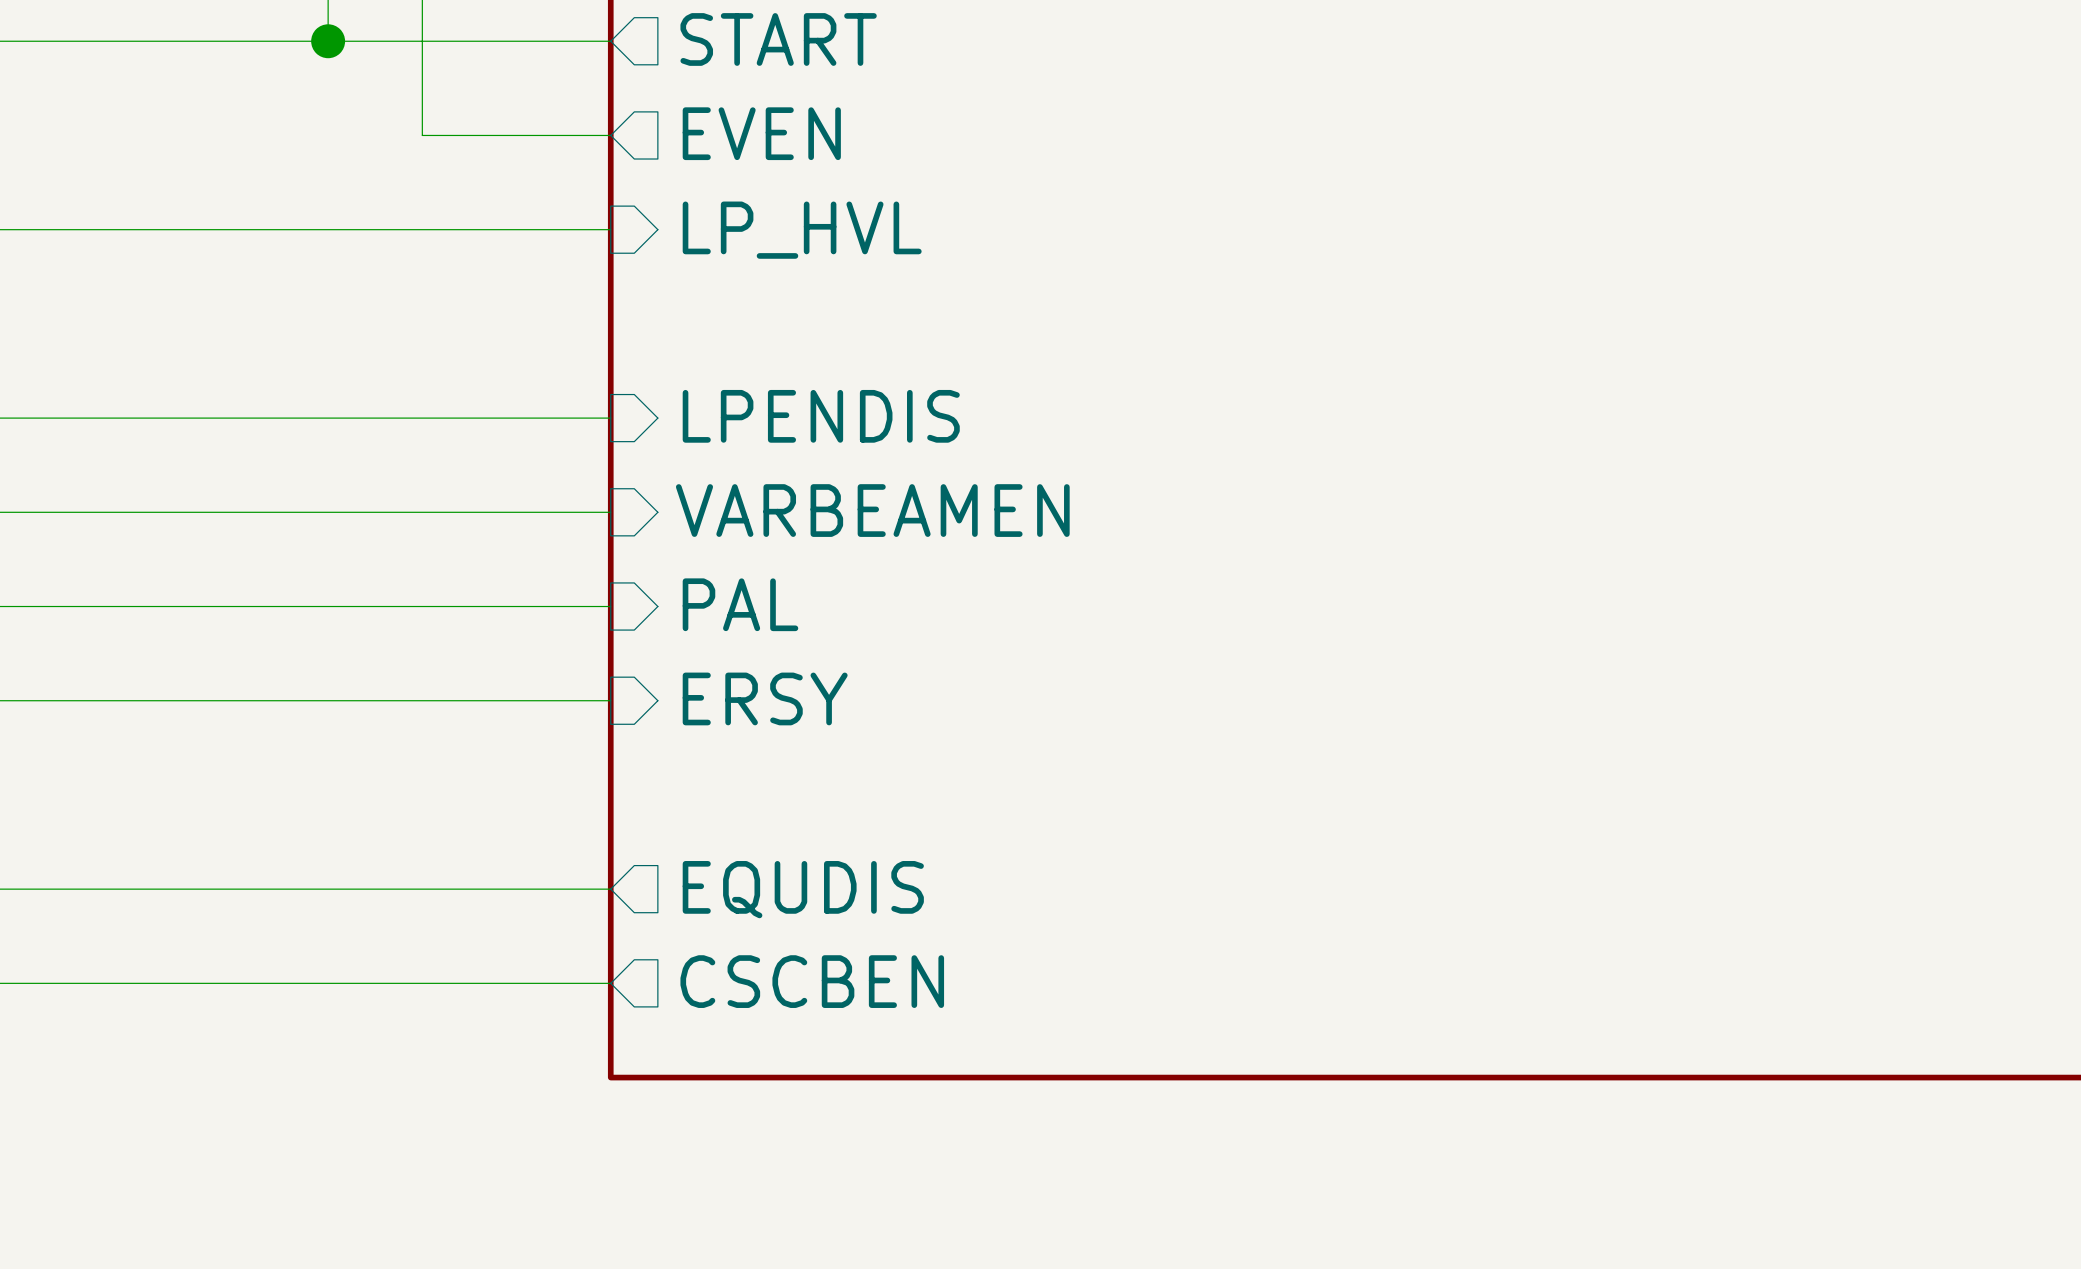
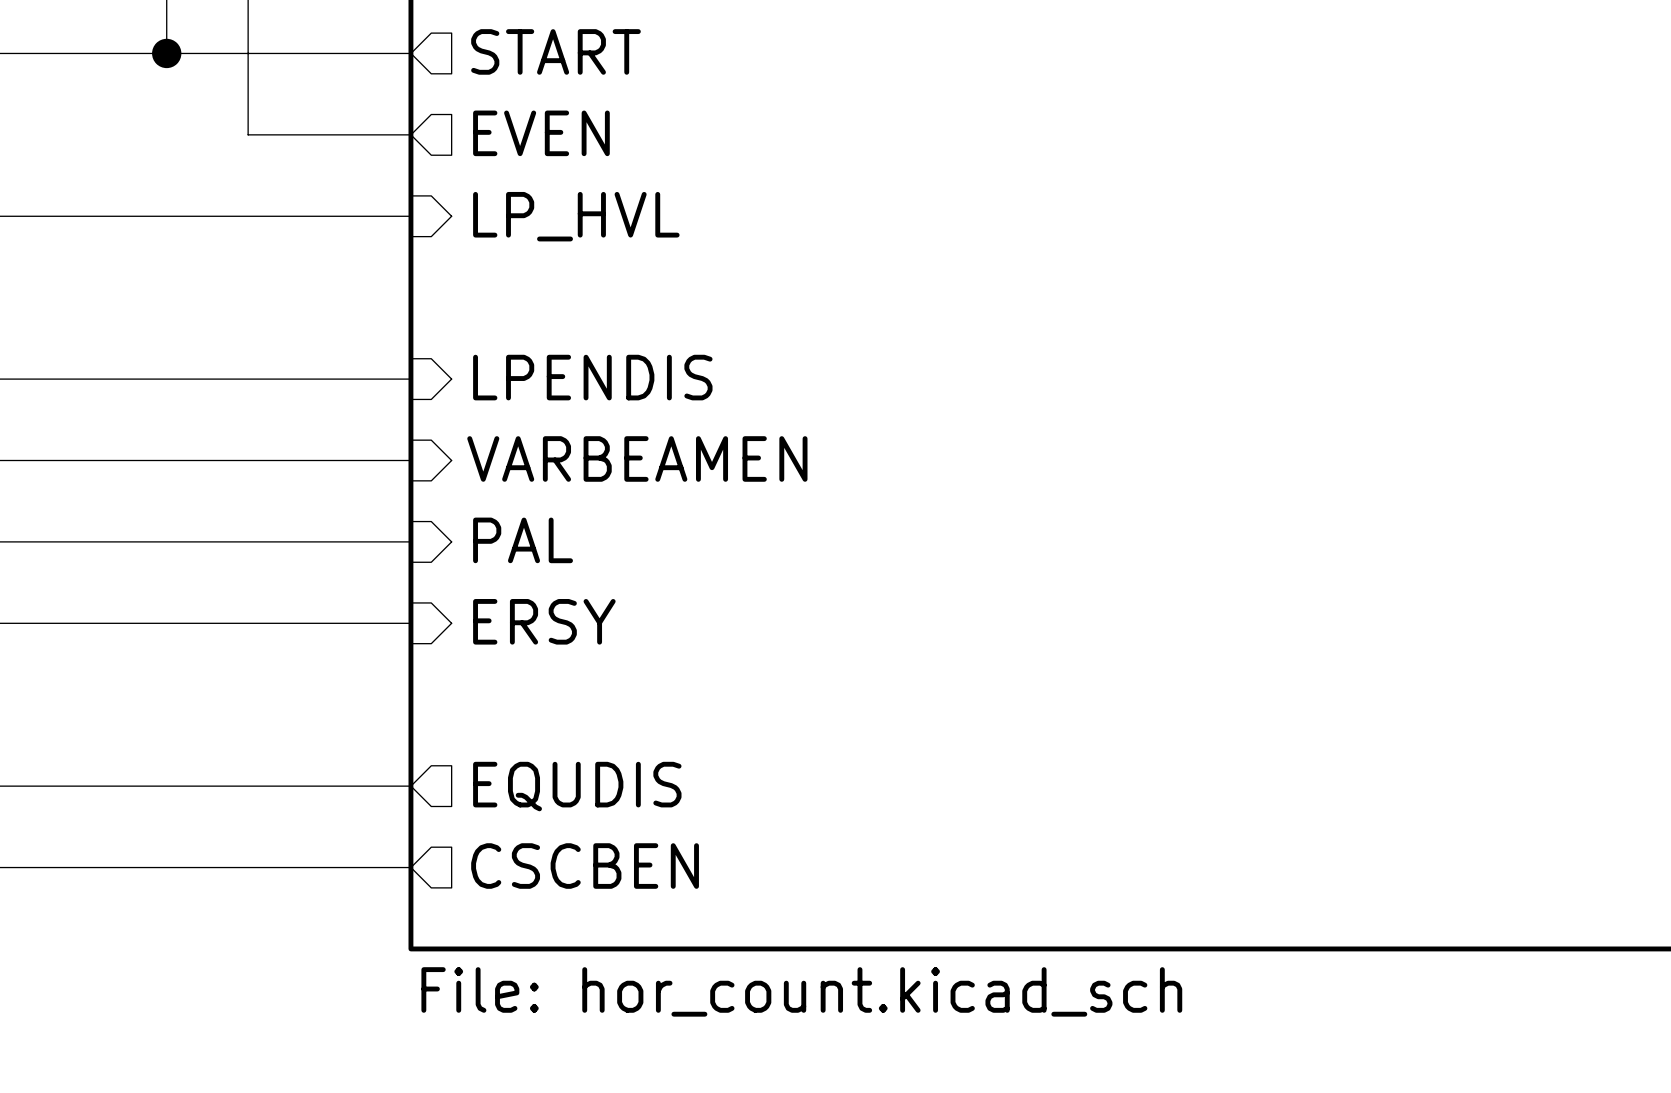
sheet value: none -> File: hor_count.kicad_sch (801, 991)

